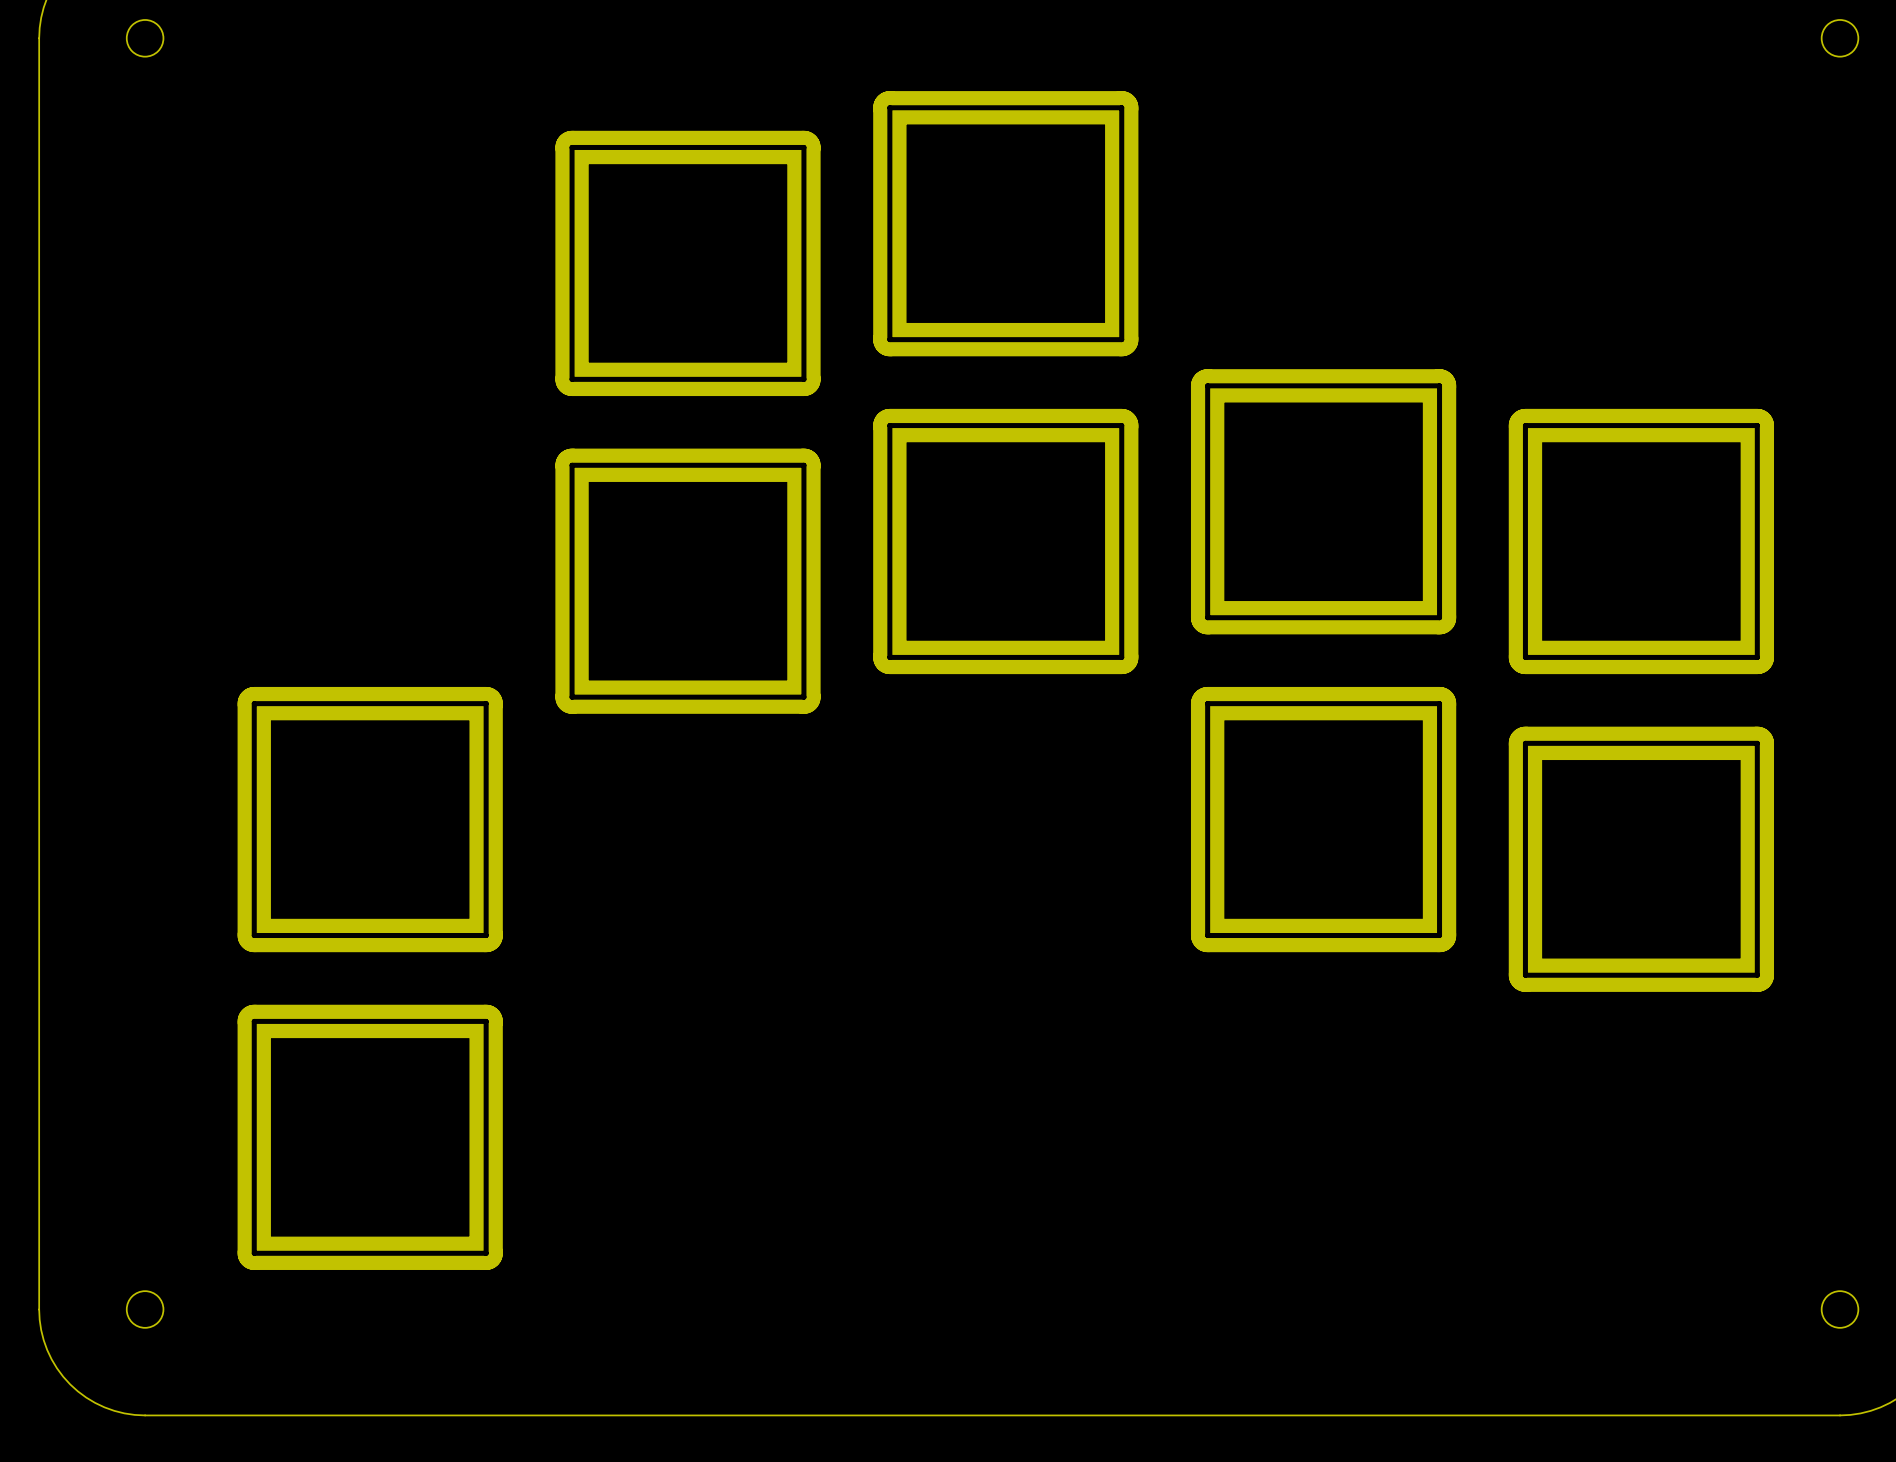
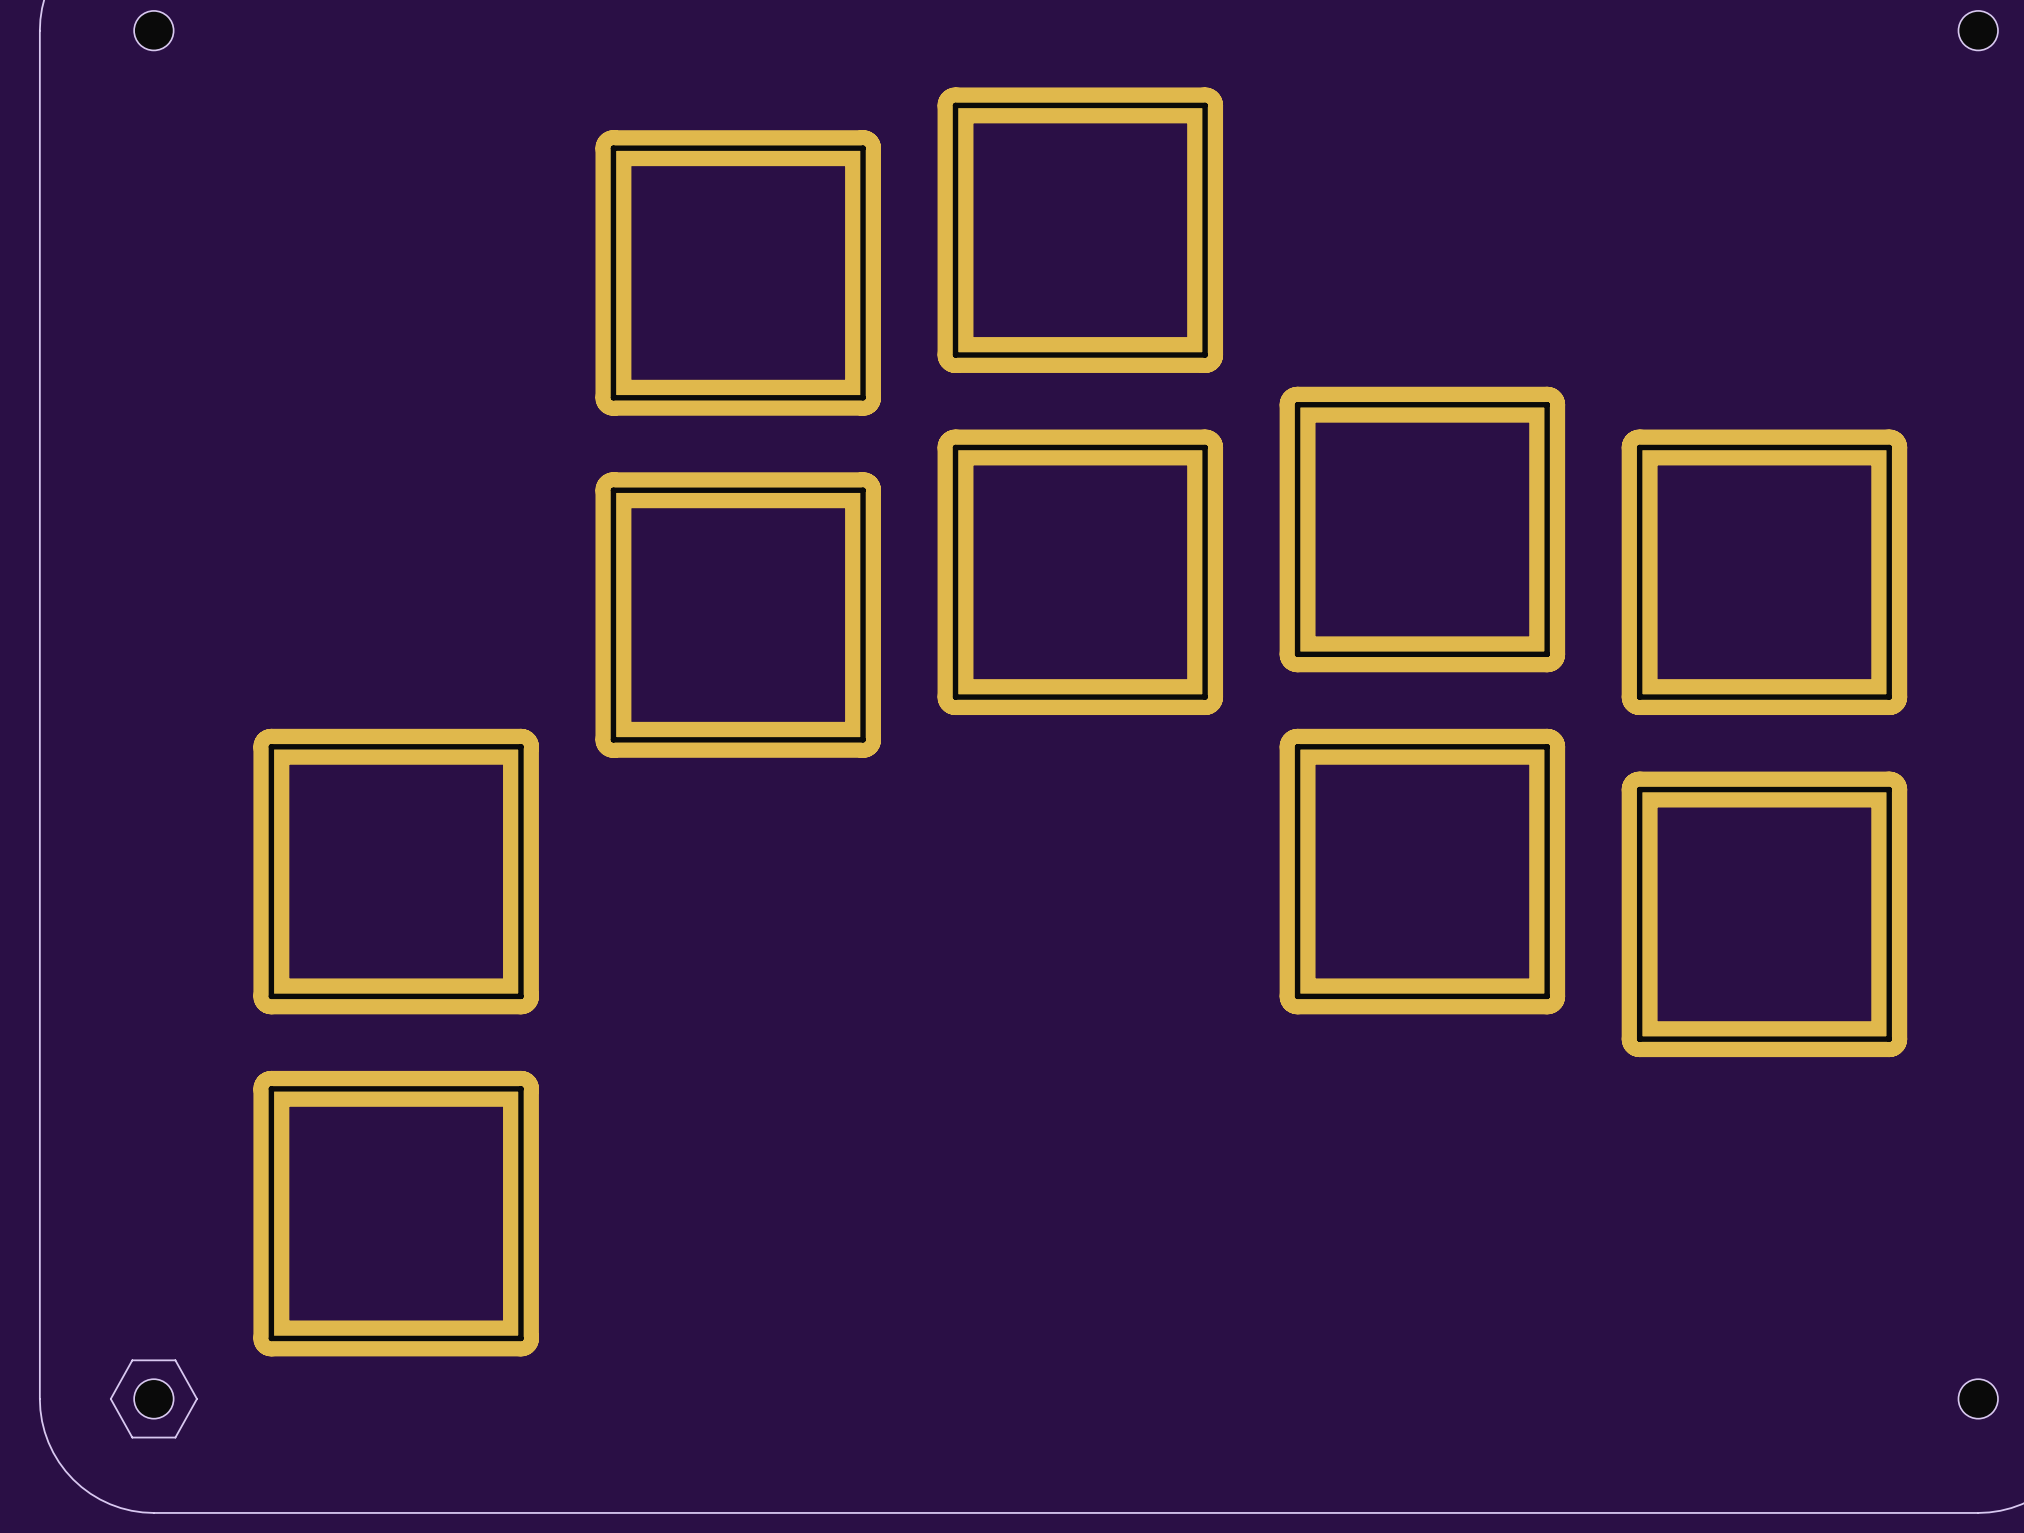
drawing: none -> [109, 1359, 198, 1439]

